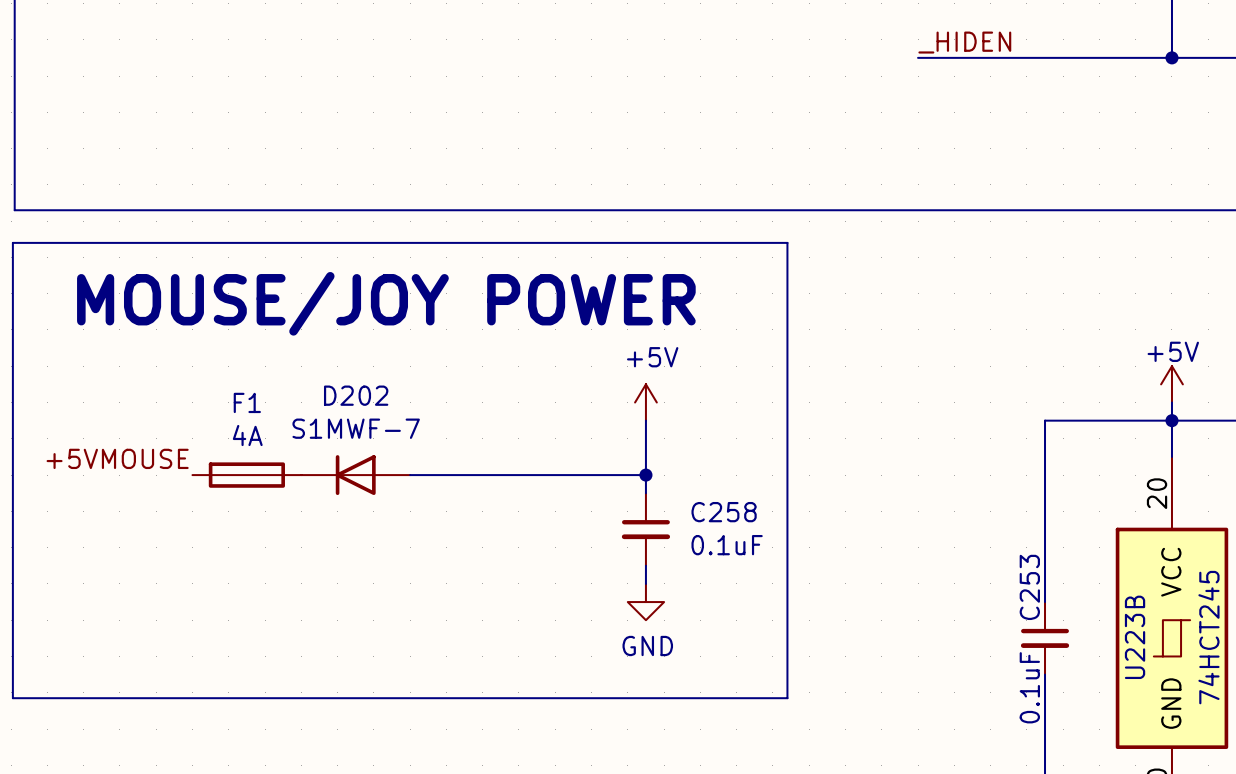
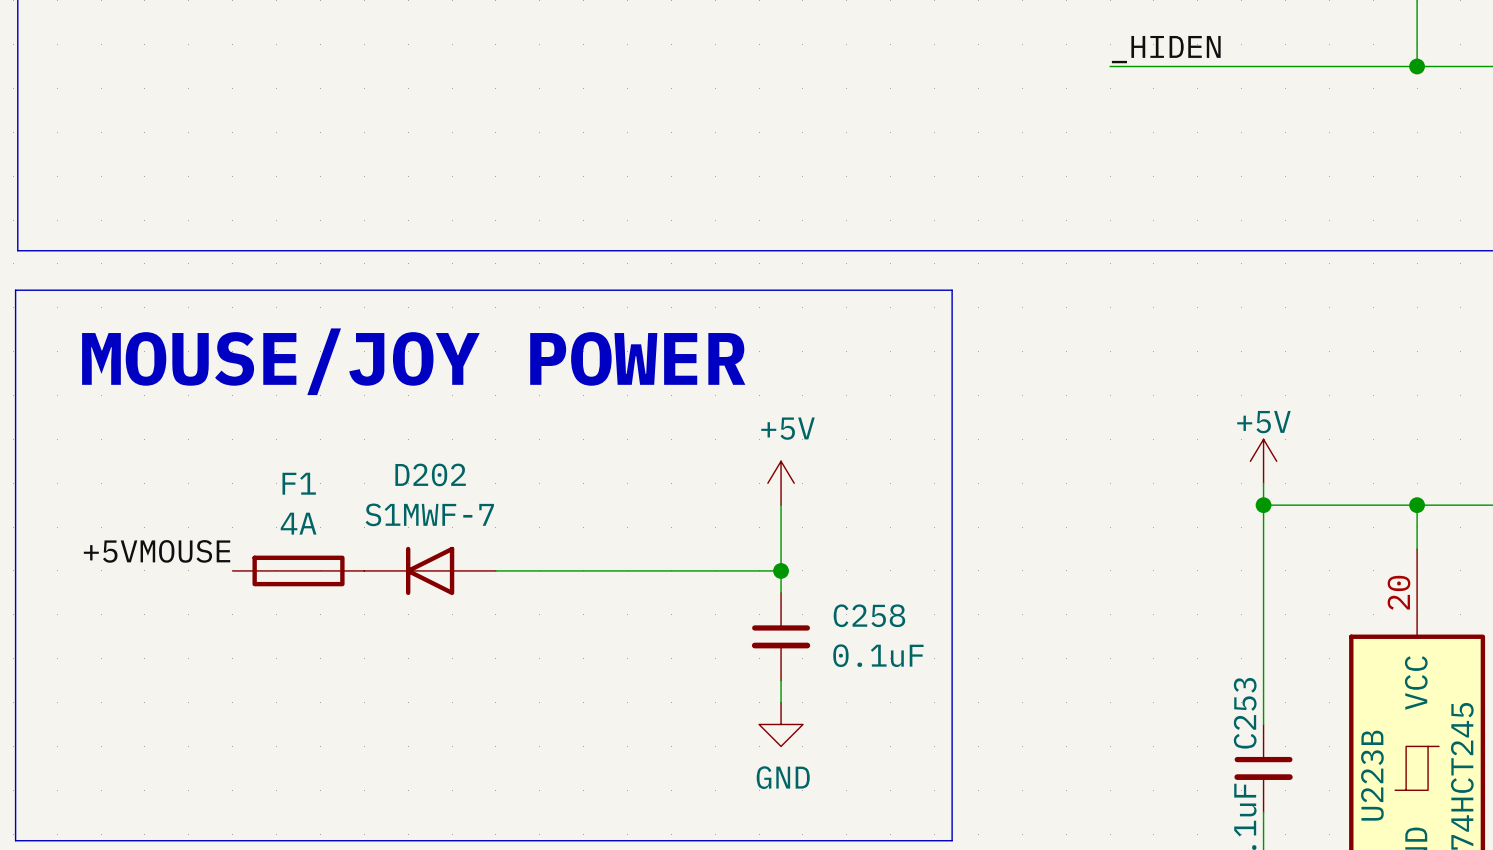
power symbol position: +5V (1171, 384) -> +5V (1263, 461)
wire: (1171, 402) (1171, 420) -> (1263, 483) (1263, 505)
junction: none -> (1263, 505)

